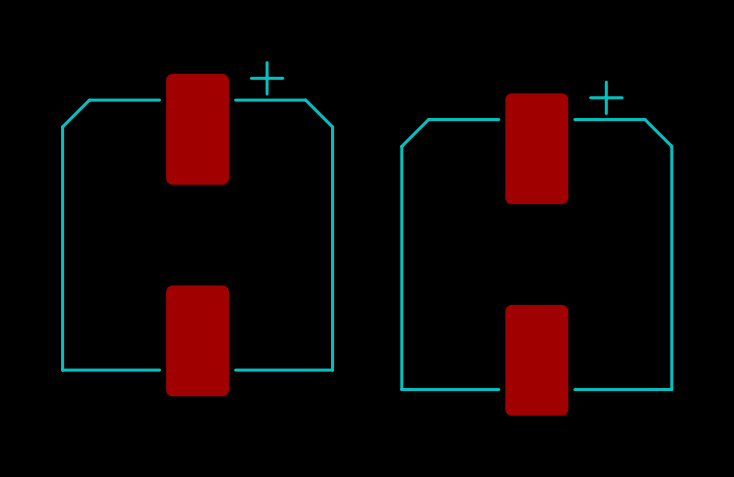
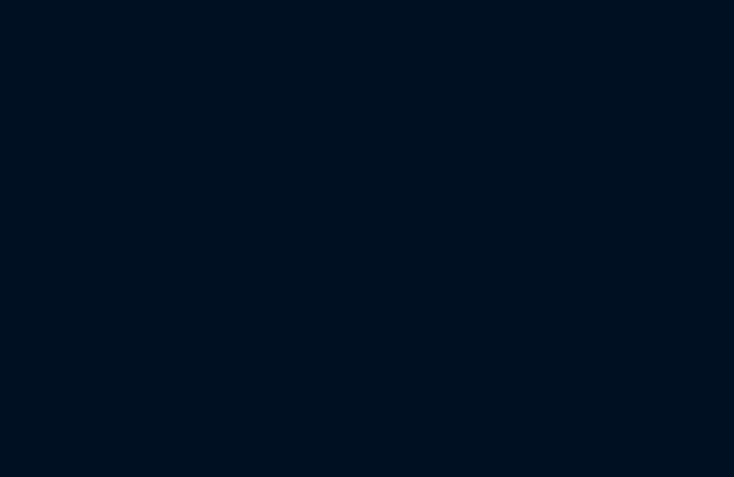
part: (197, 228) -> none
part: (536, 248) -> none

